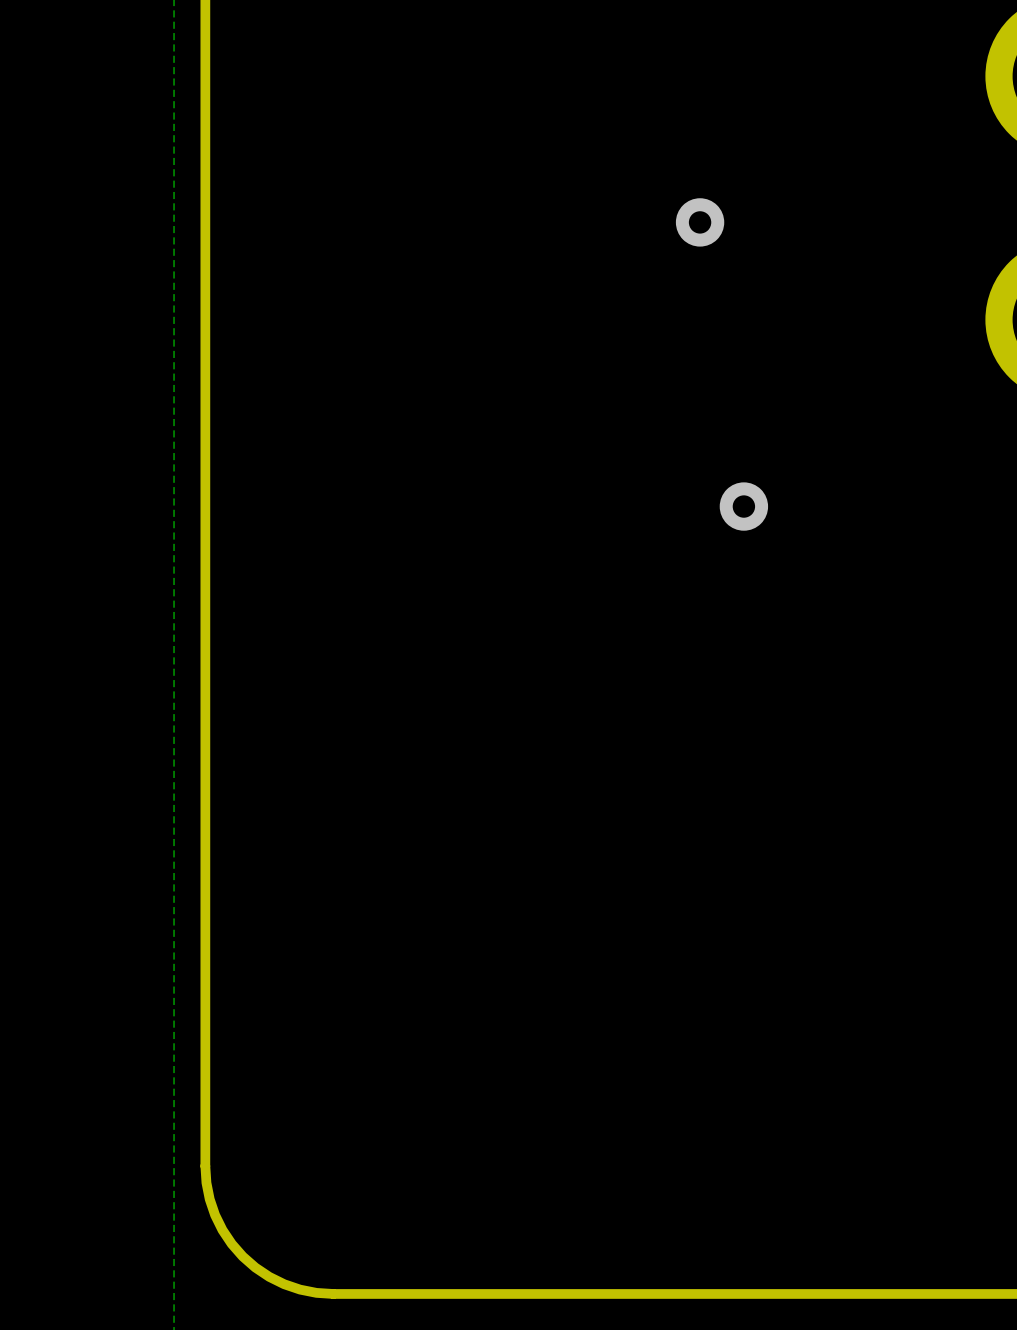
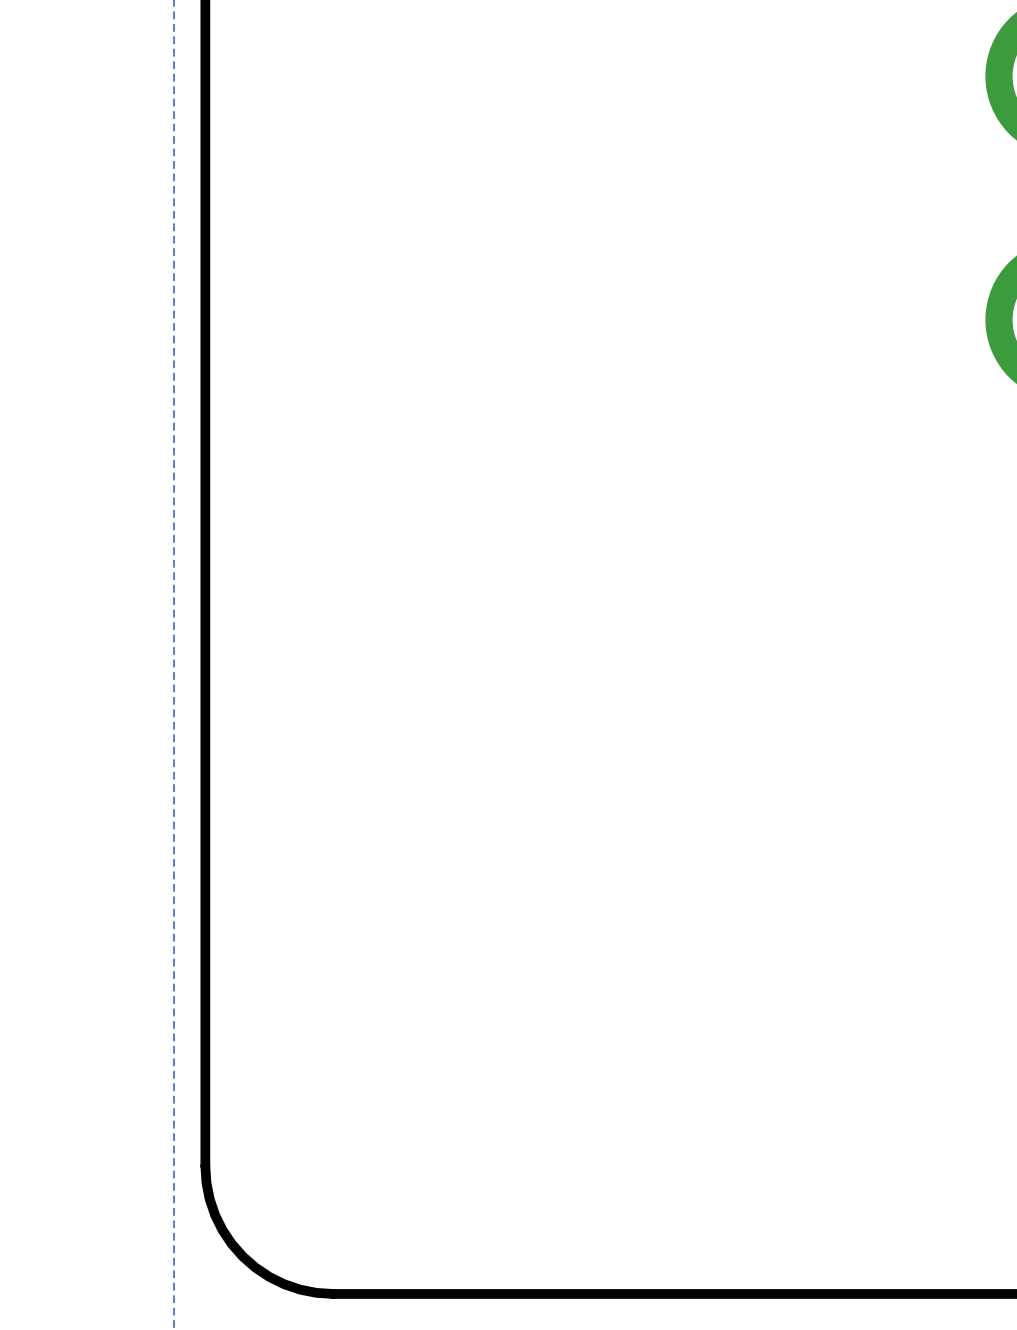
via: (700, 222) -> none
via: (743, 506) -> none

